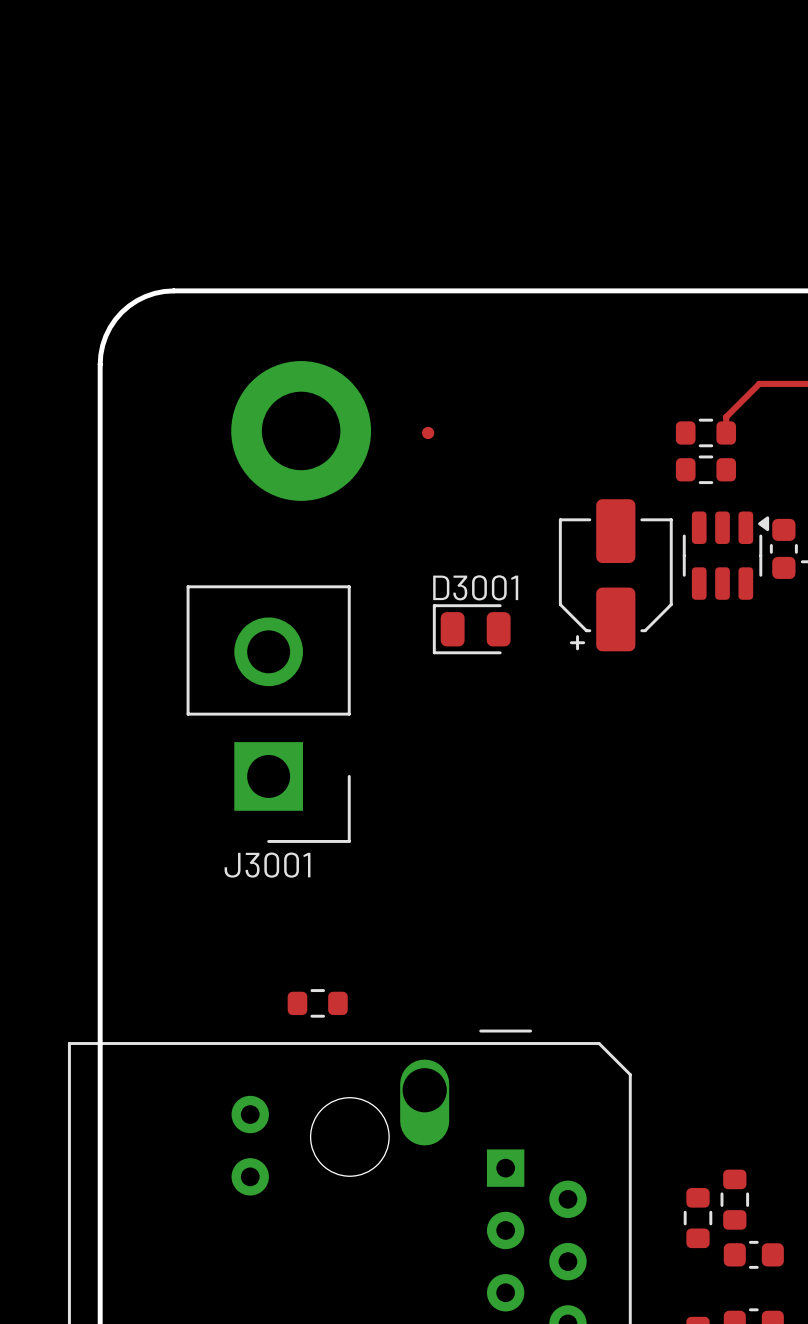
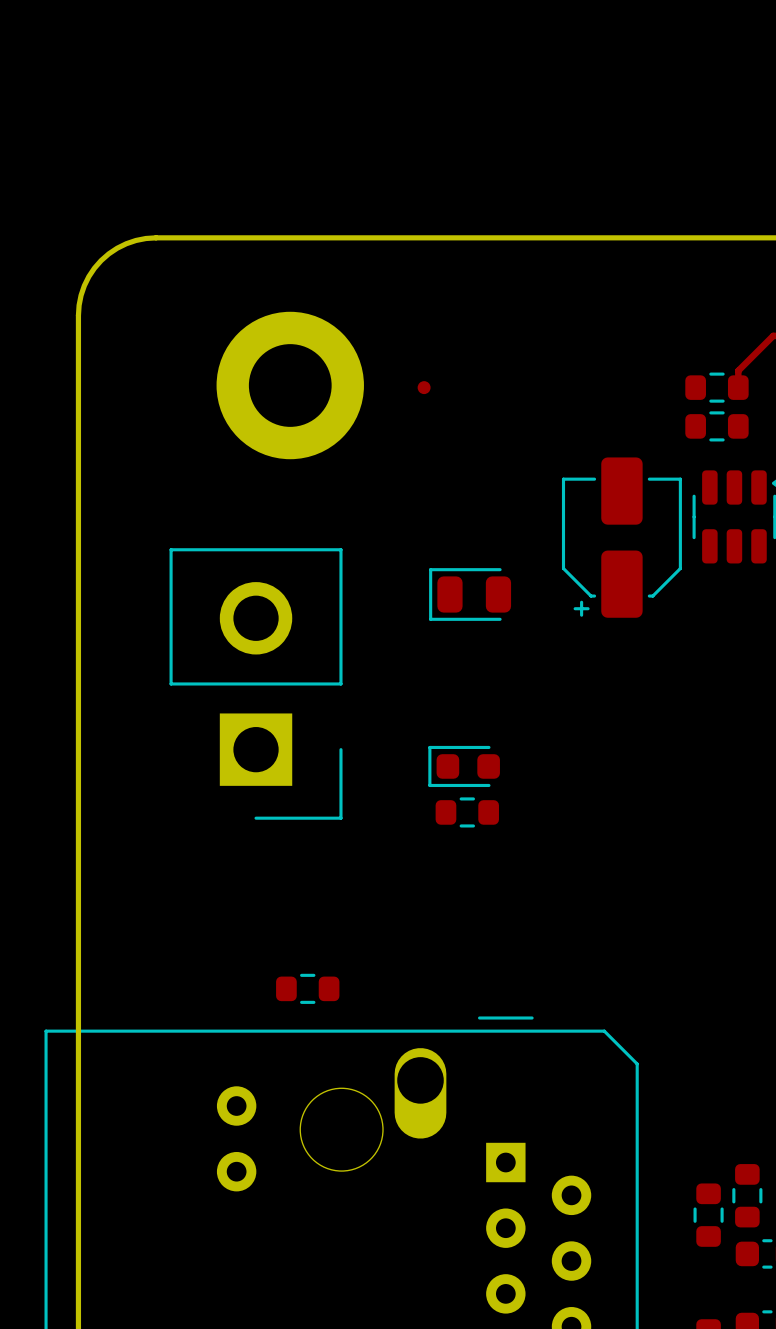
D3001 name: D3001 (475, 587) -> none
part: none -> (464, 766)
part: none -> (467, 812)
J3001 name: J3001 (267, 865) -> none

